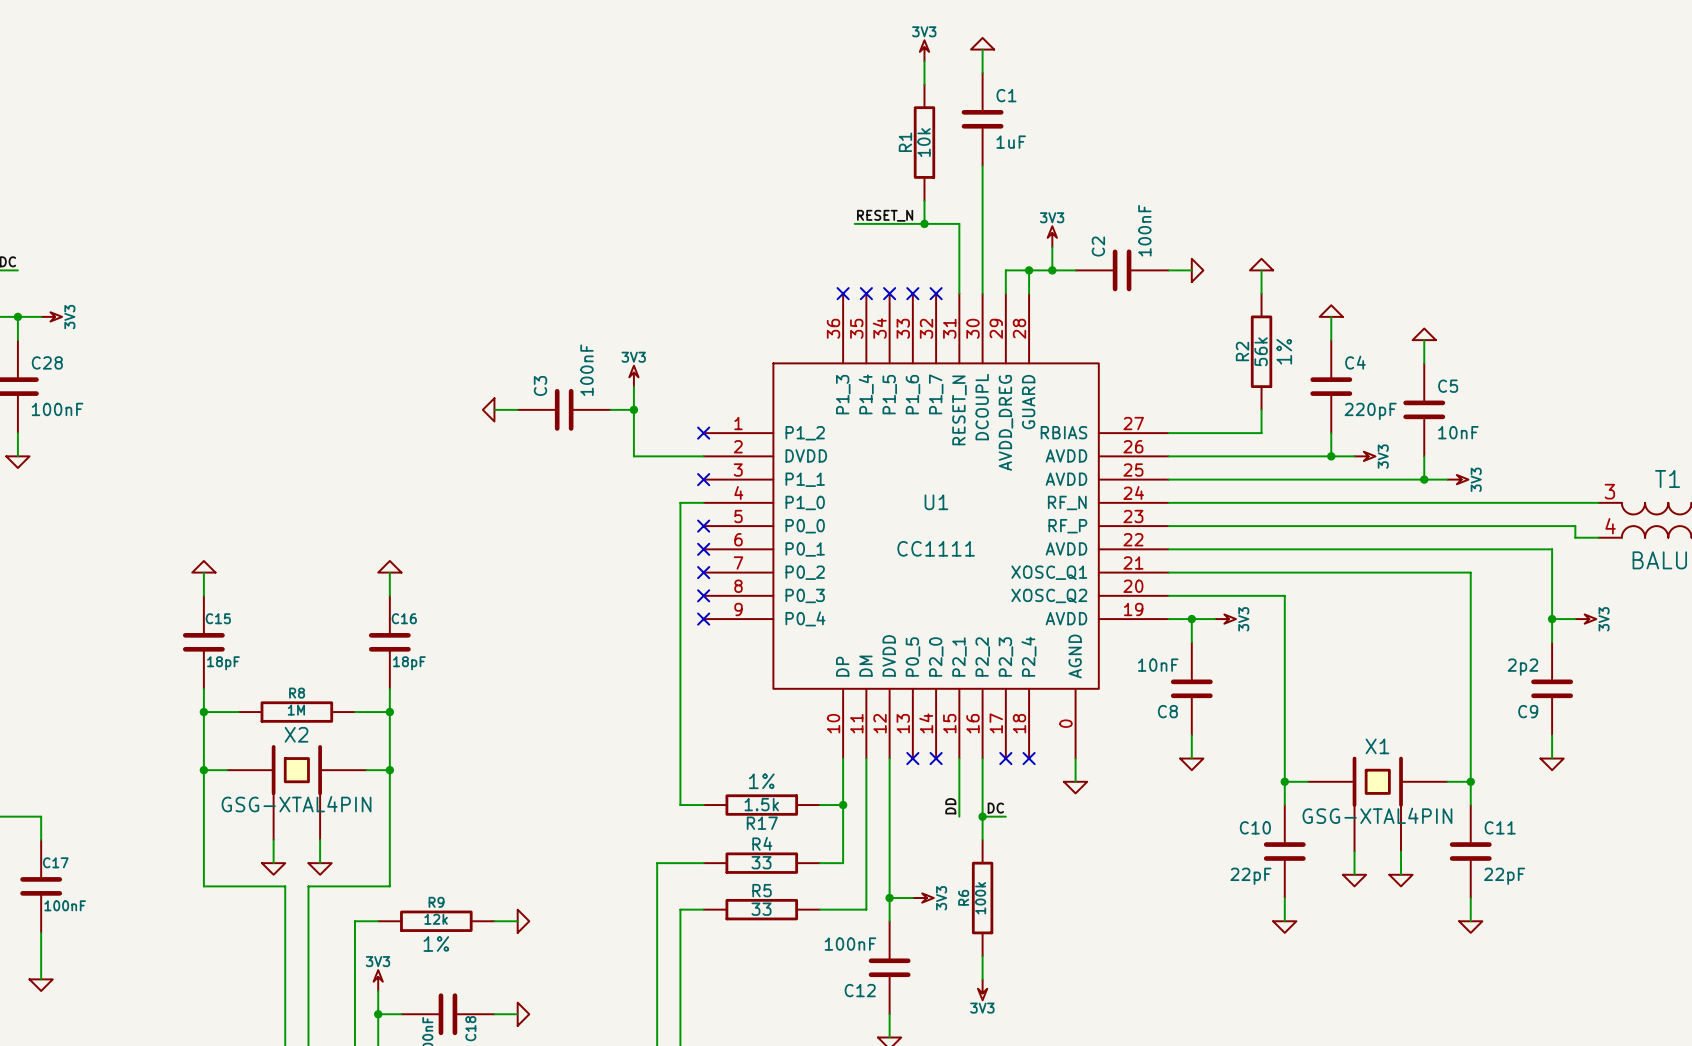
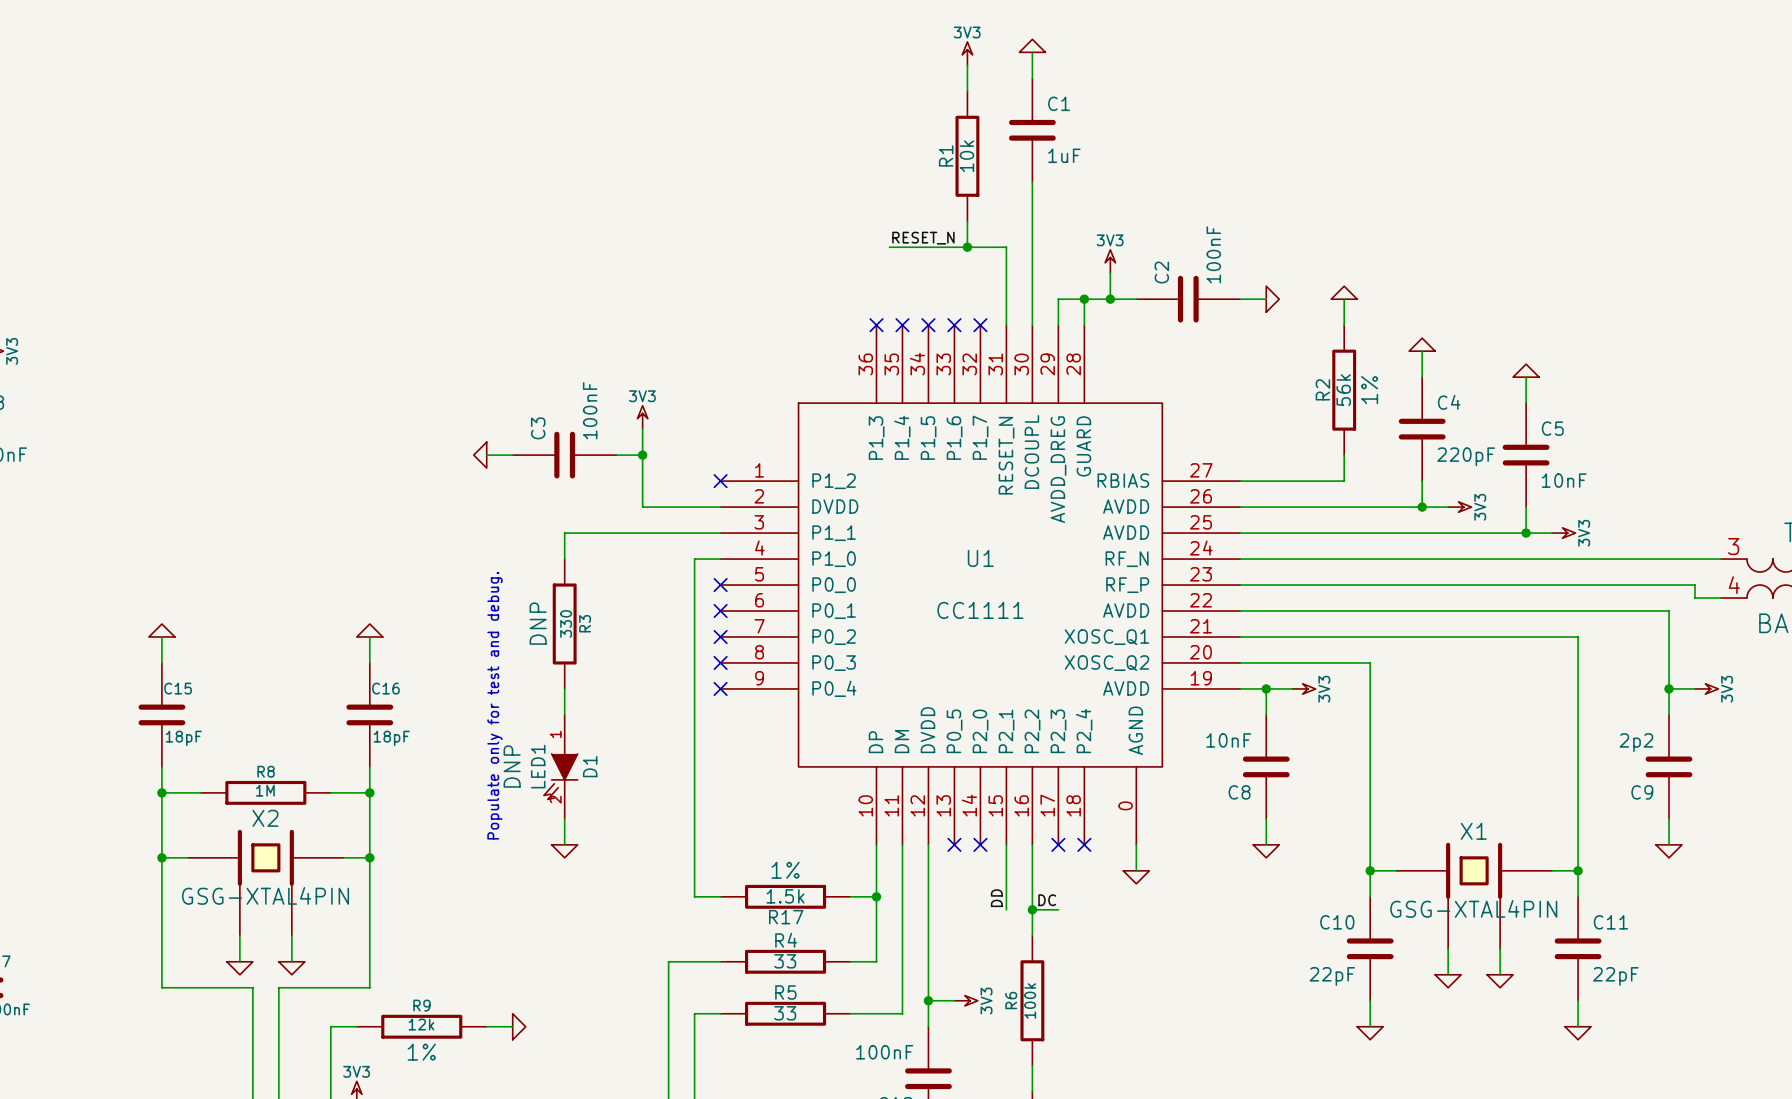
wire: none -> (720, 533) (564, 533) (564, 559)
no-connect mark: (703, 479) -> none
R3: none -> 330 (564, 624)
wire: none -> (564, 688) (564, 714)
text: none -> Populate only for test and debug. (494, 705)
D1: none -> LED1 (560, 766)
wire: none -> (564, 818) (564, 844)
power symbol: none -> (564, 851)

